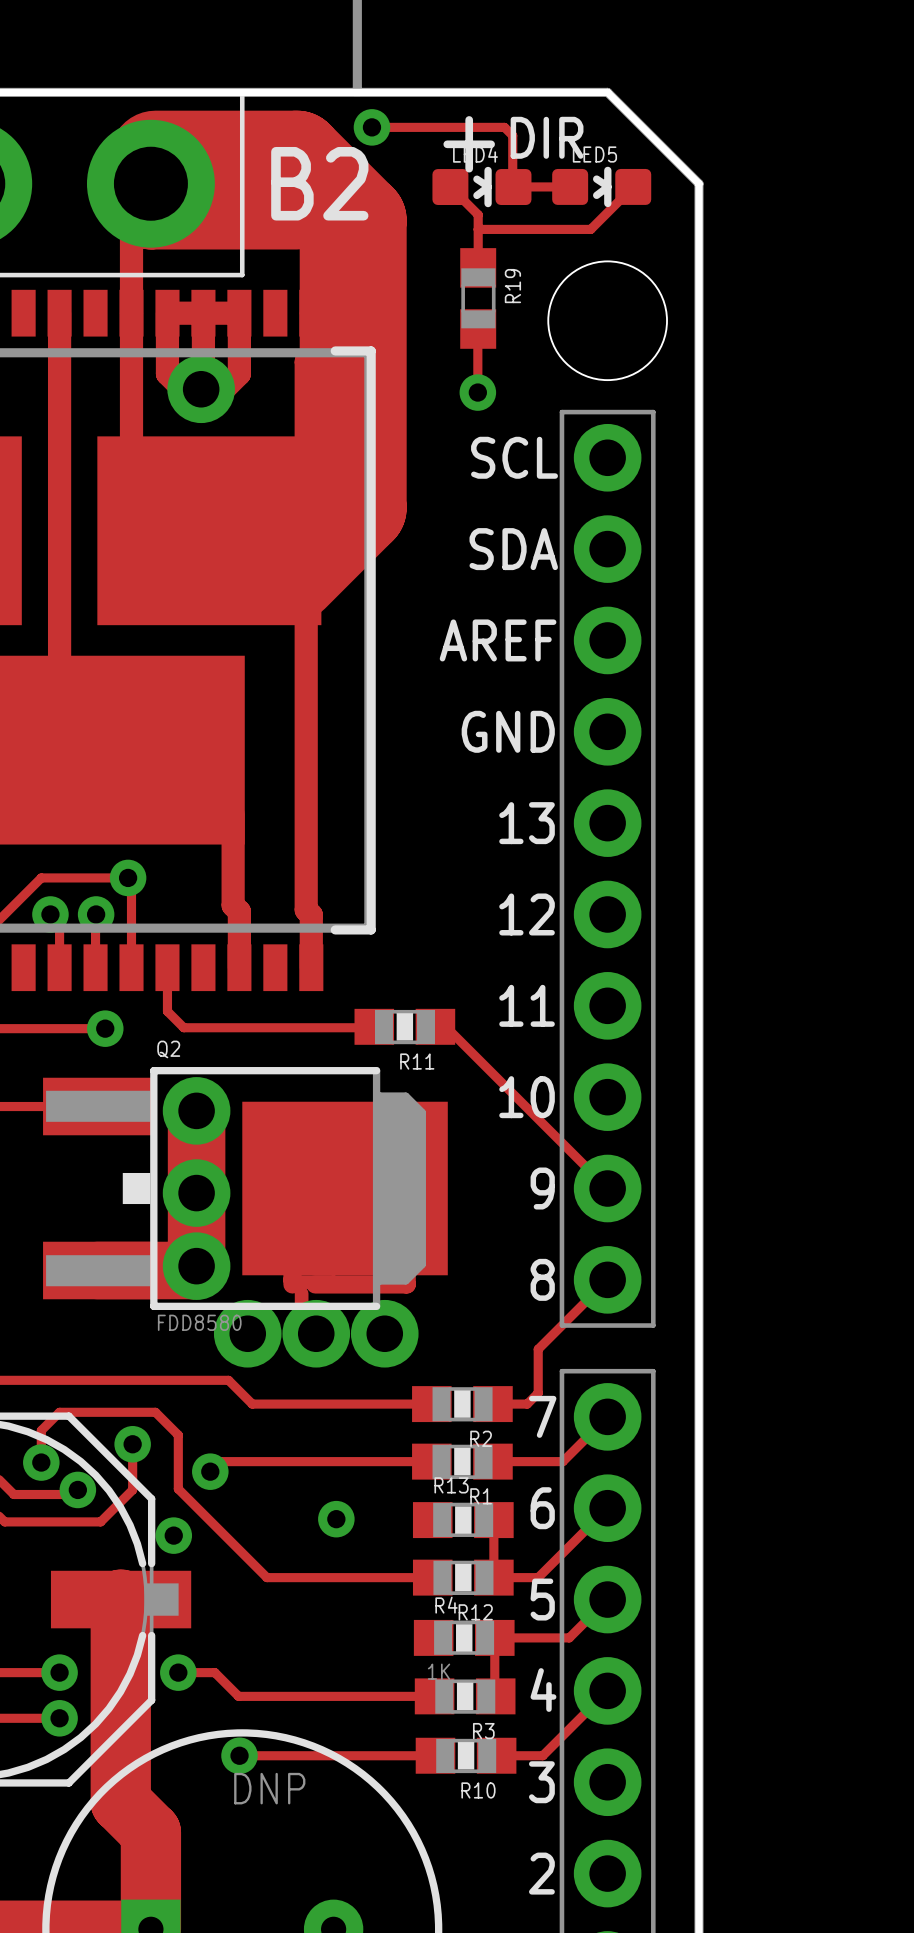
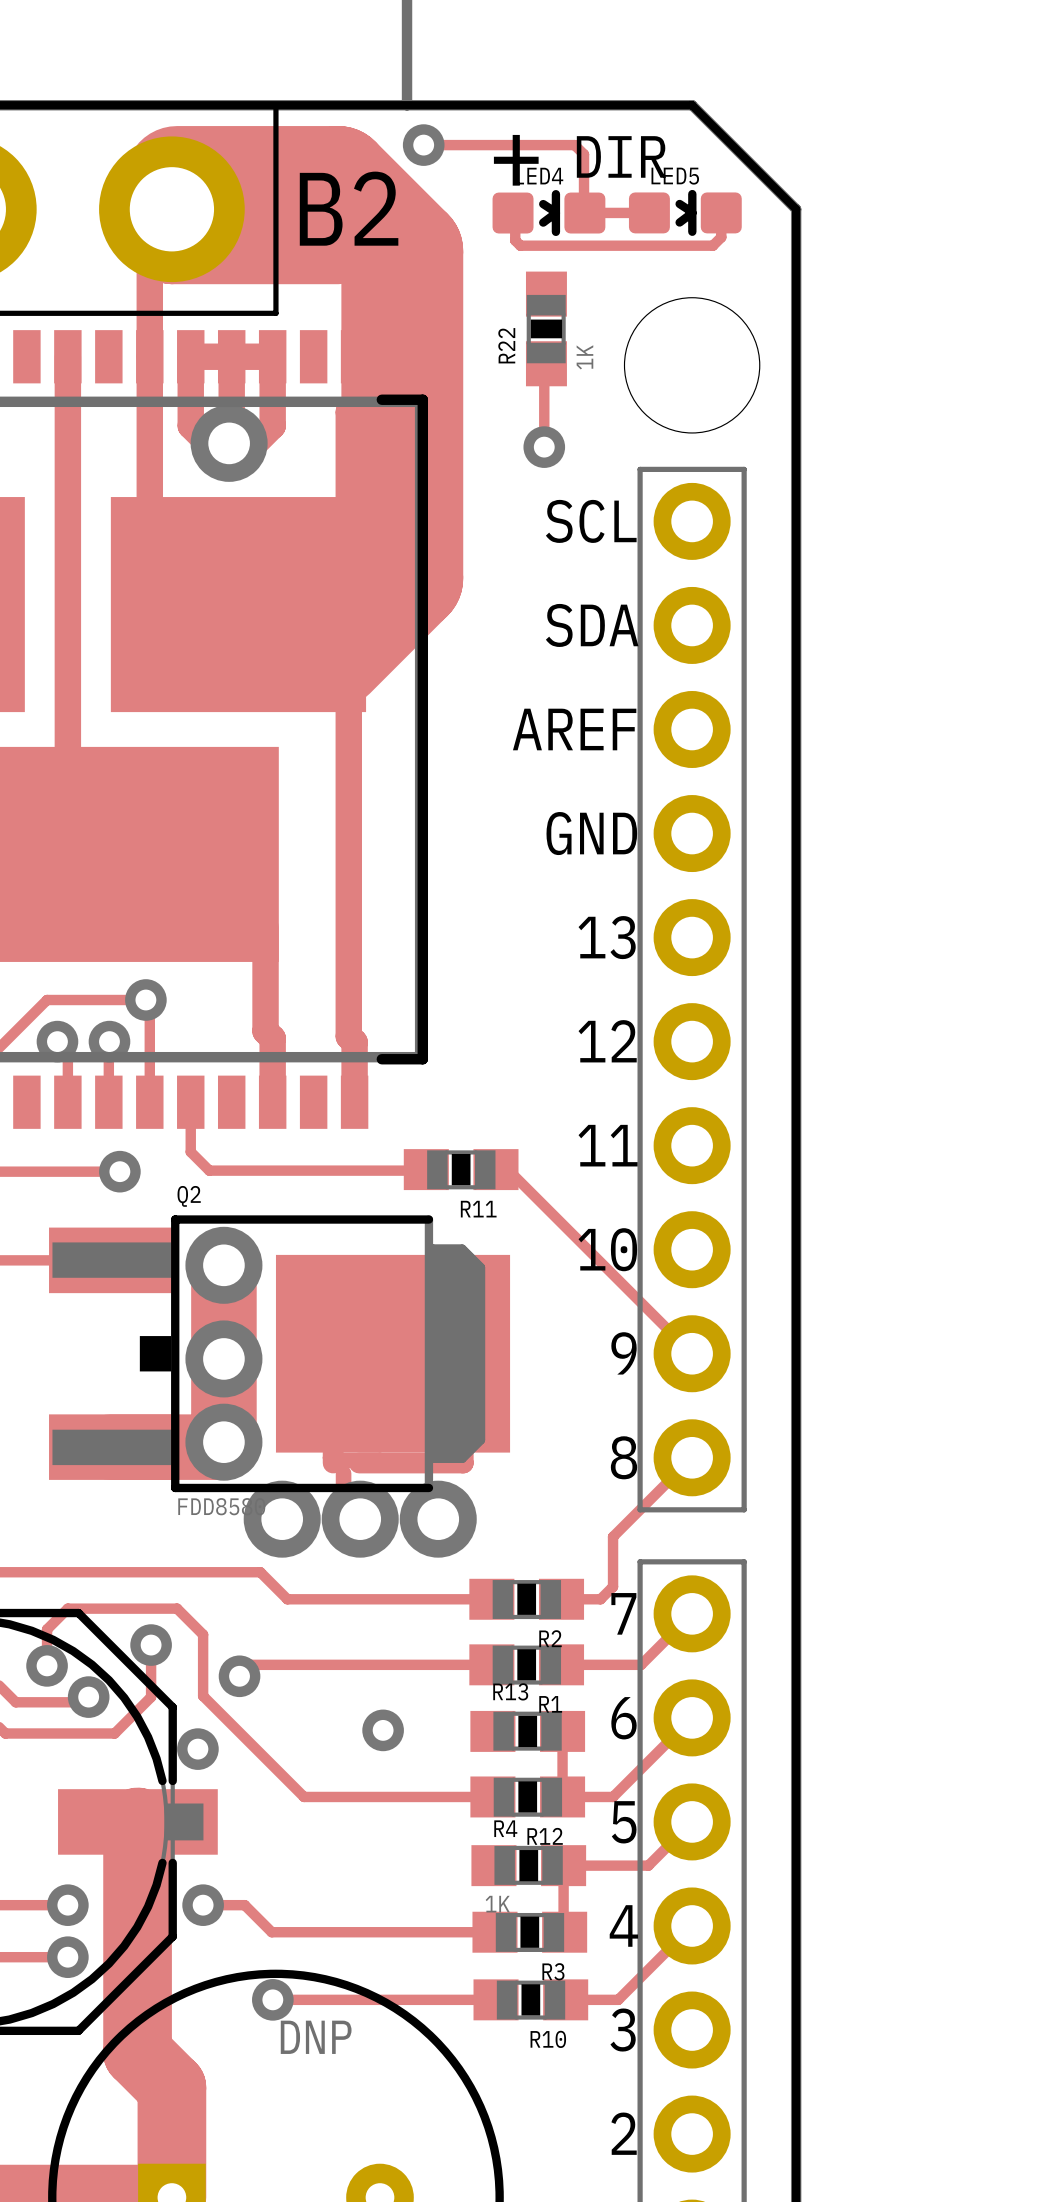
track: (633, 186) (590, 229) (478, 229) -> (721, 212) (721, 237) (712, 245) (520, 245) (515, 240) (515, 215)
track: (452, 188) (478, 214) (478, 267) -> none
R22: none -> 1K (546, 328)
R19: (478, 298) -> none

